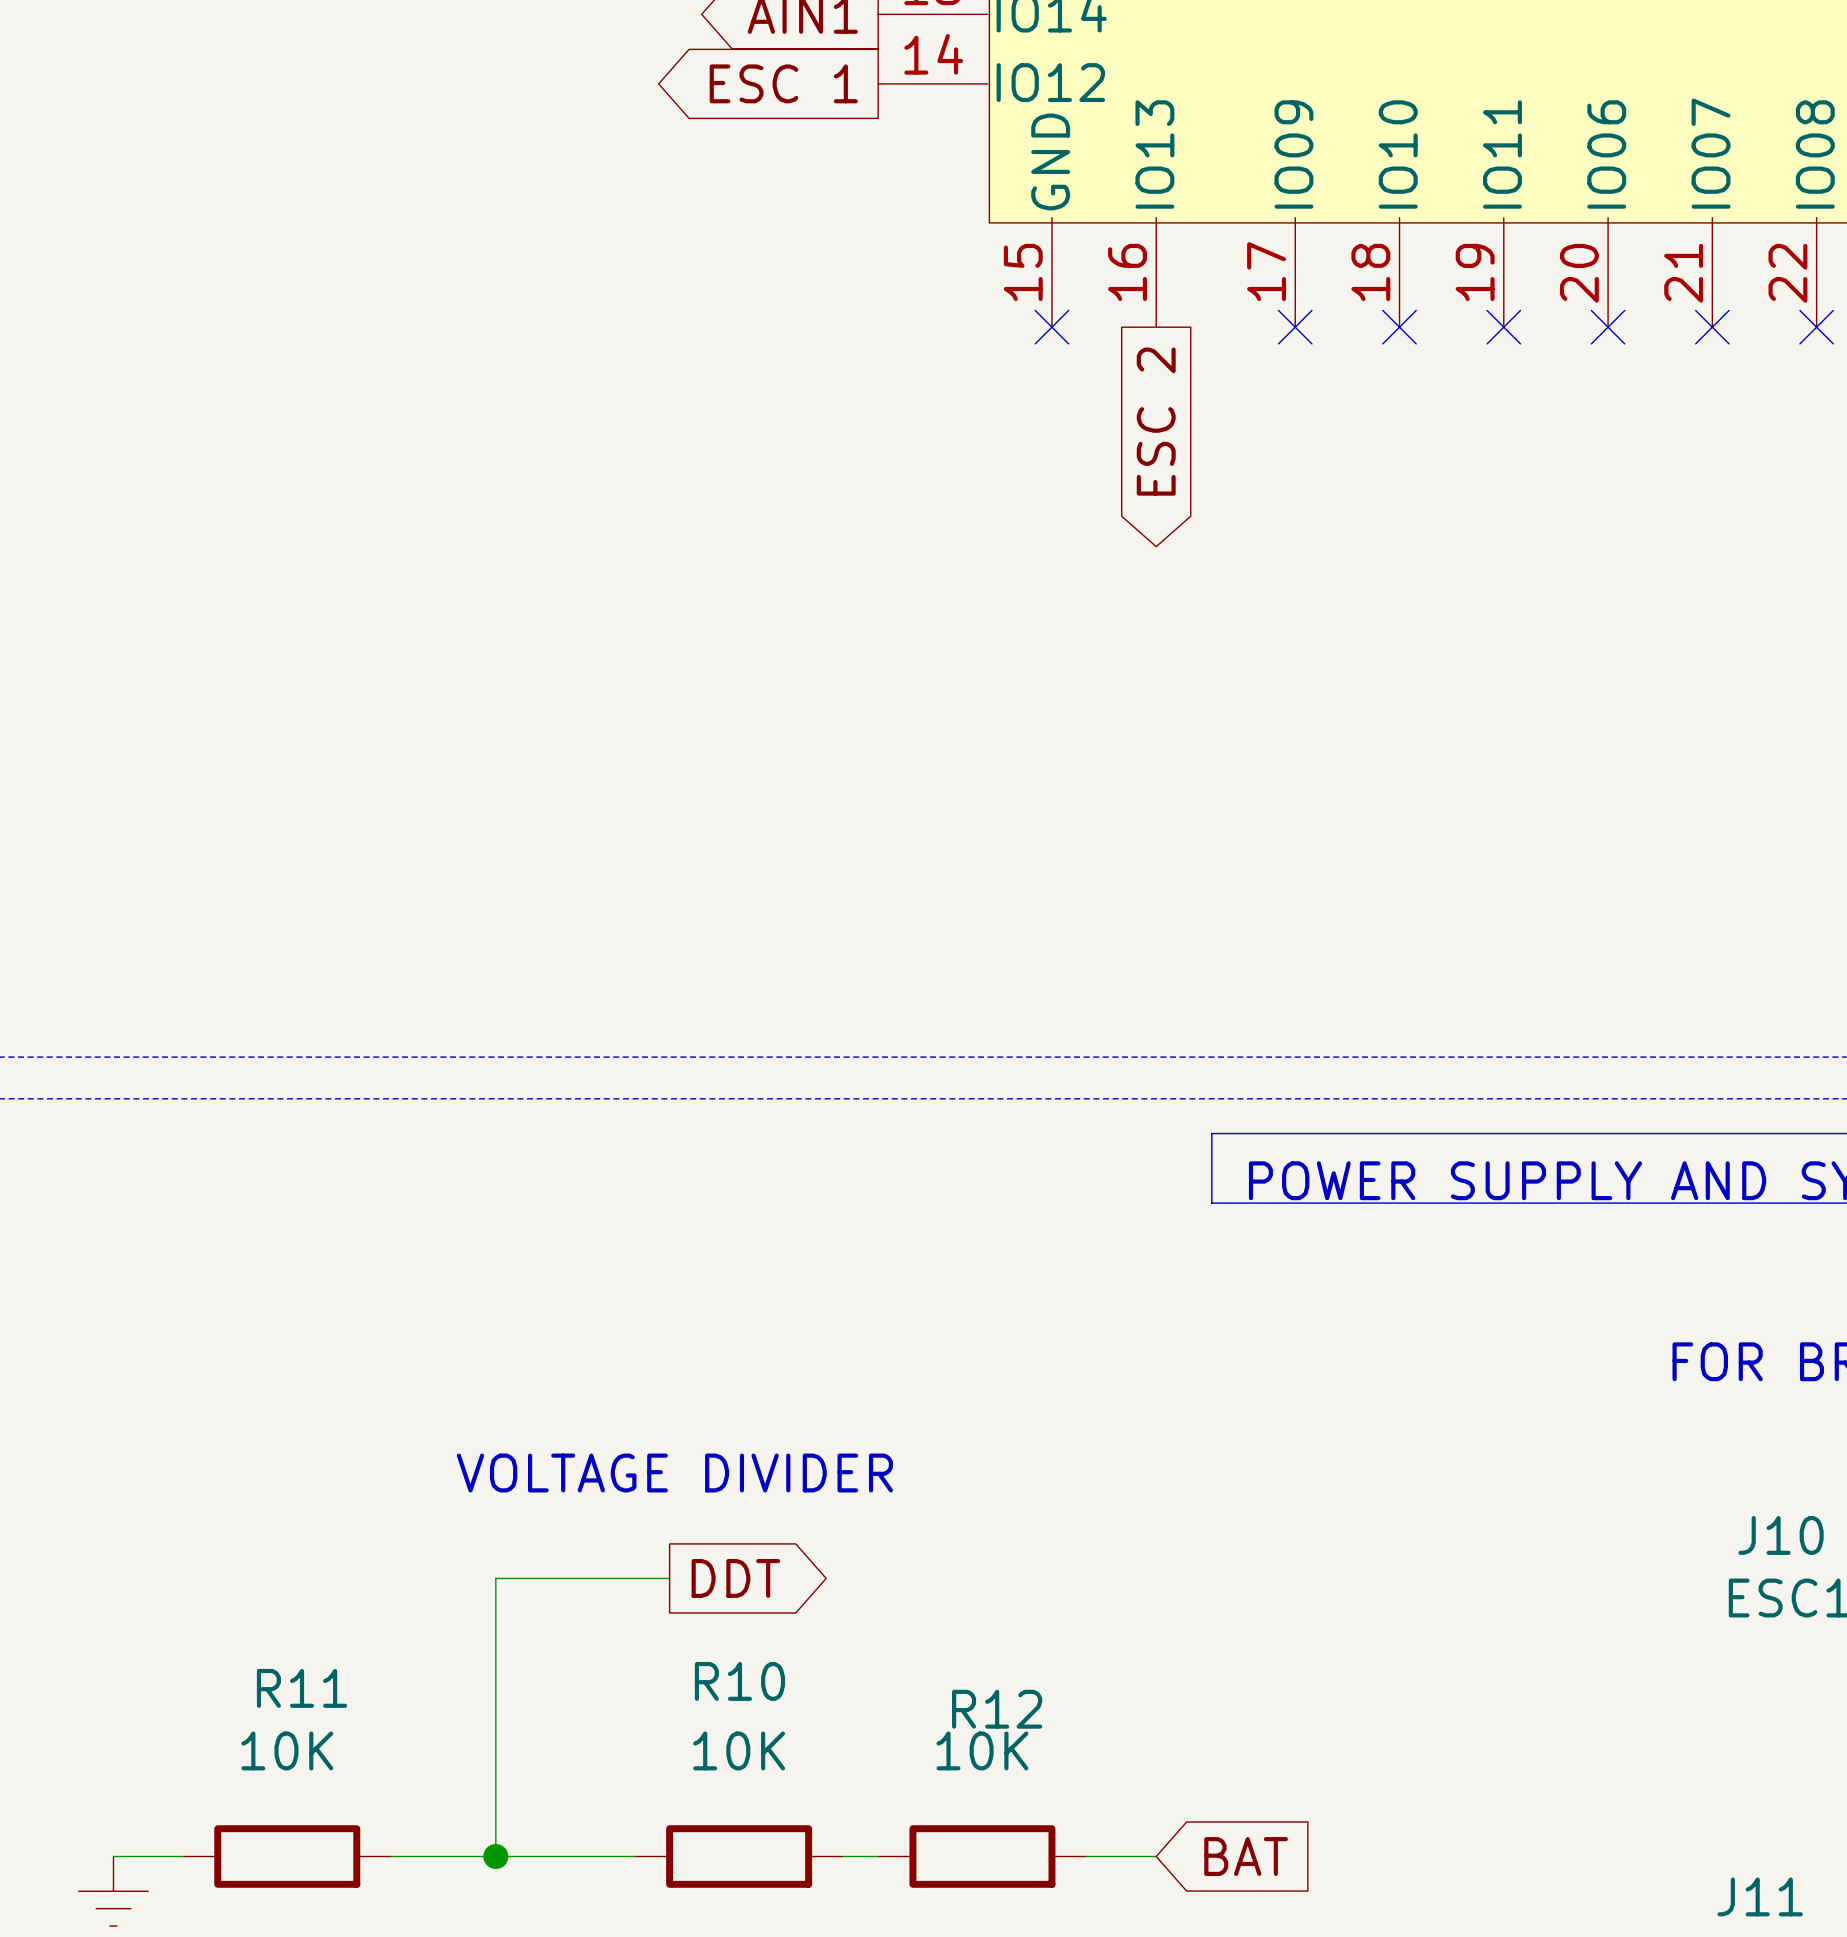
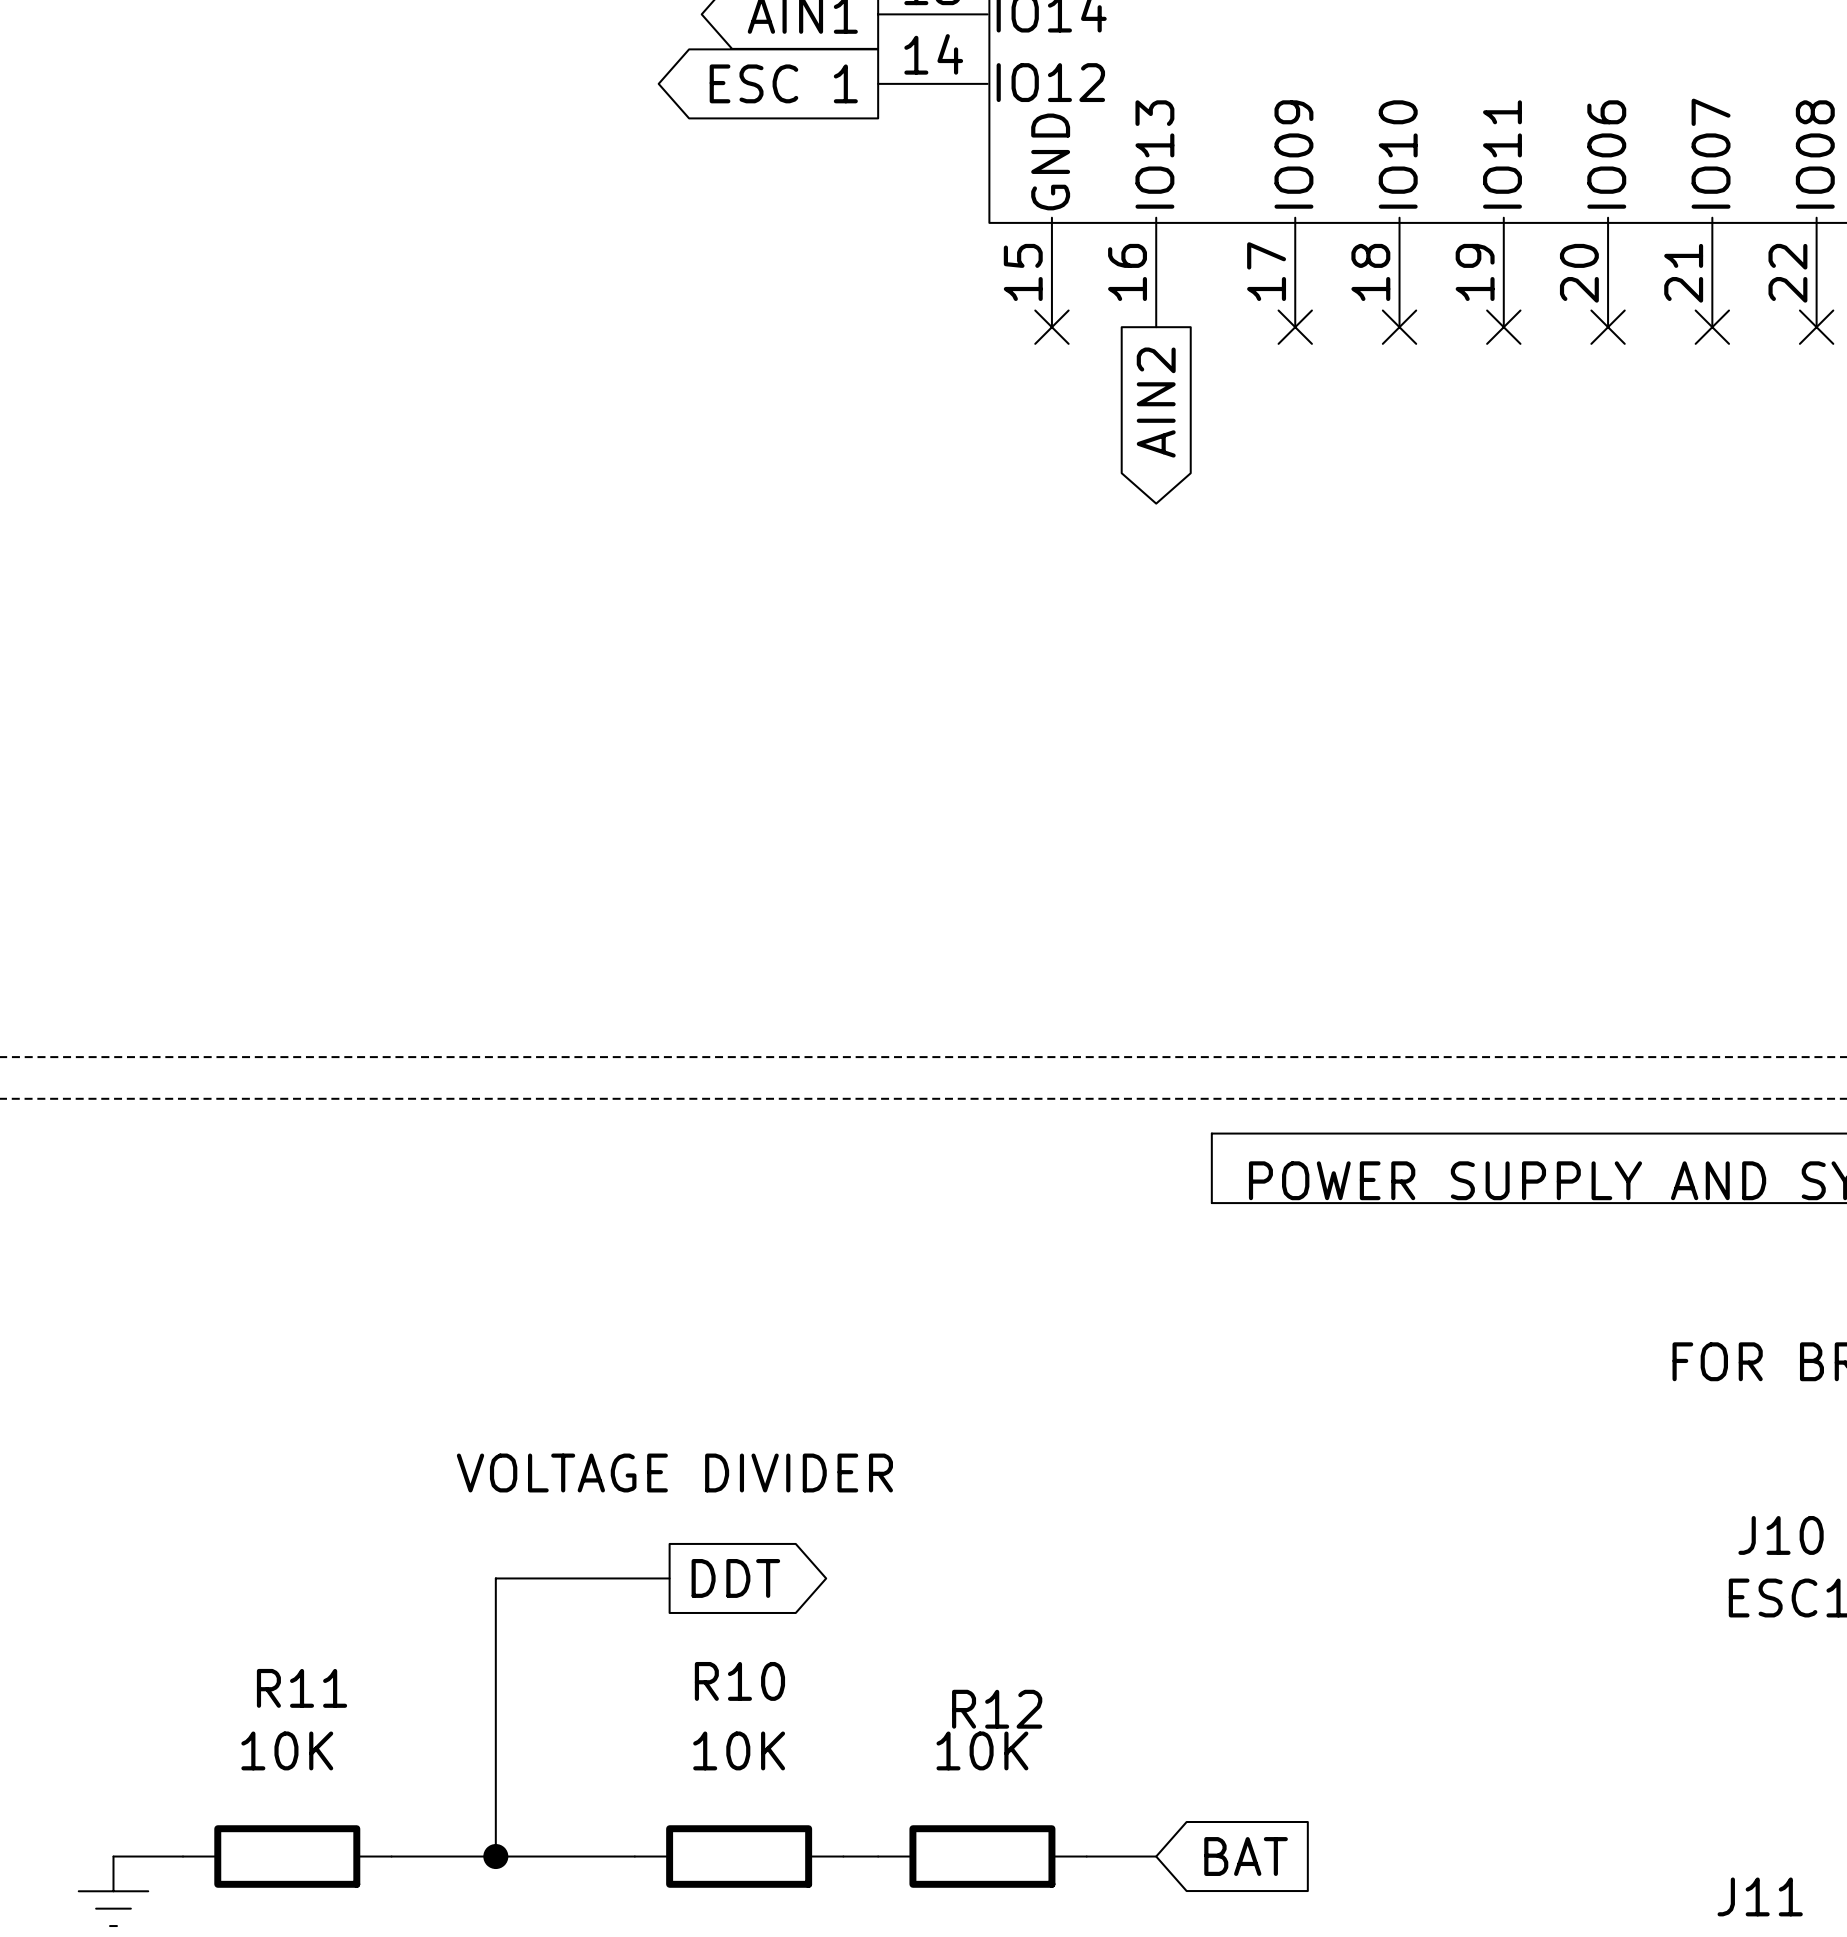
global label: ESC 2 (1156, 421) -> AIN2 (1156, 402)

